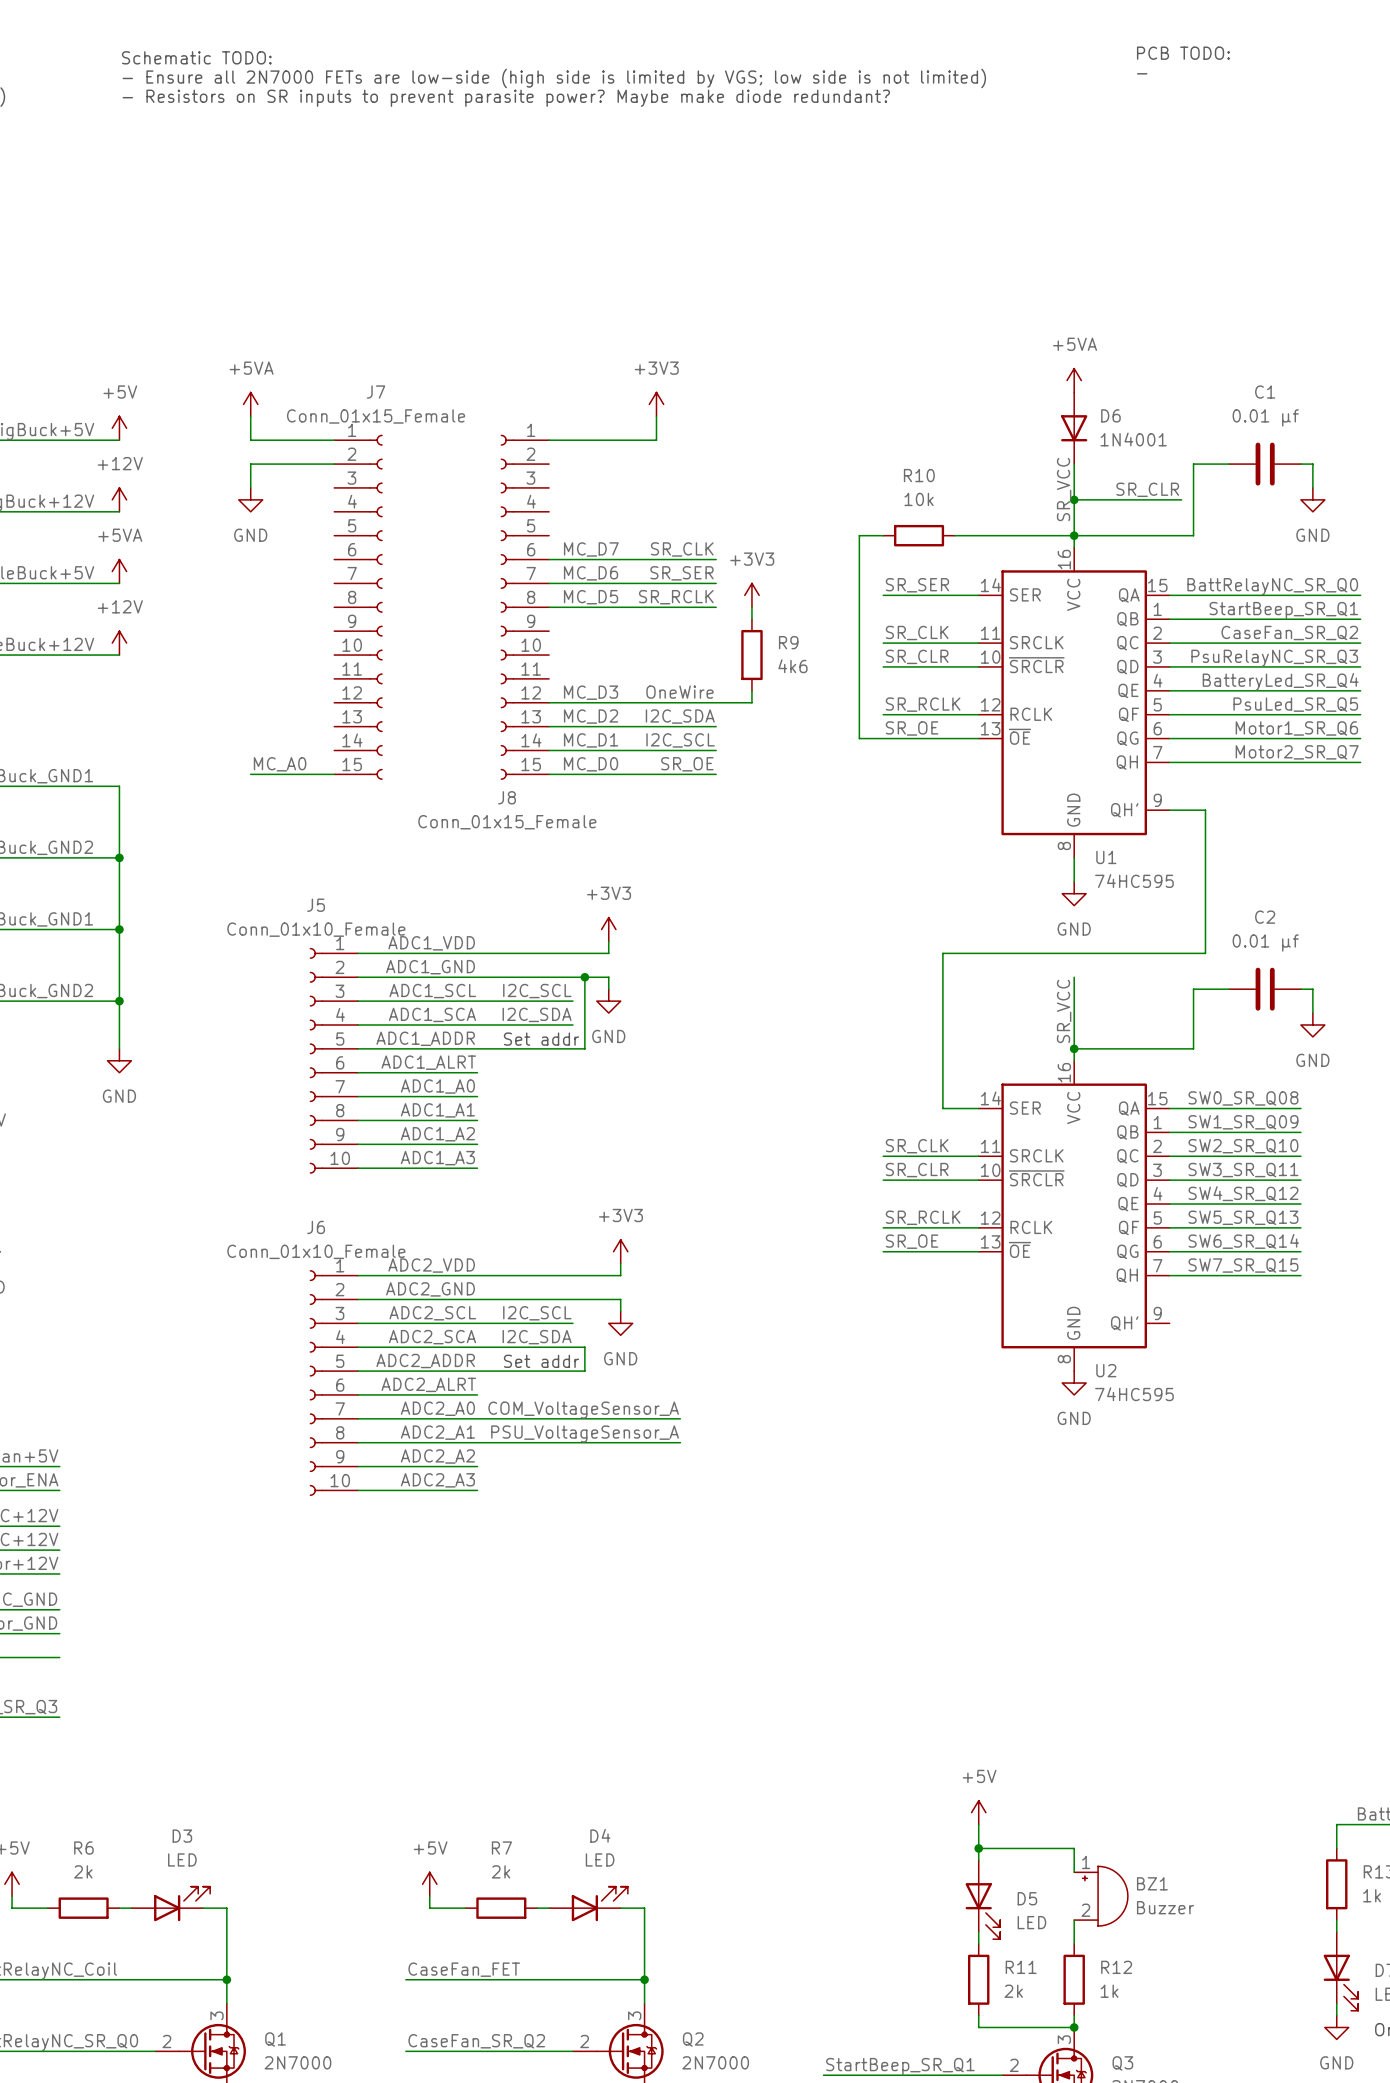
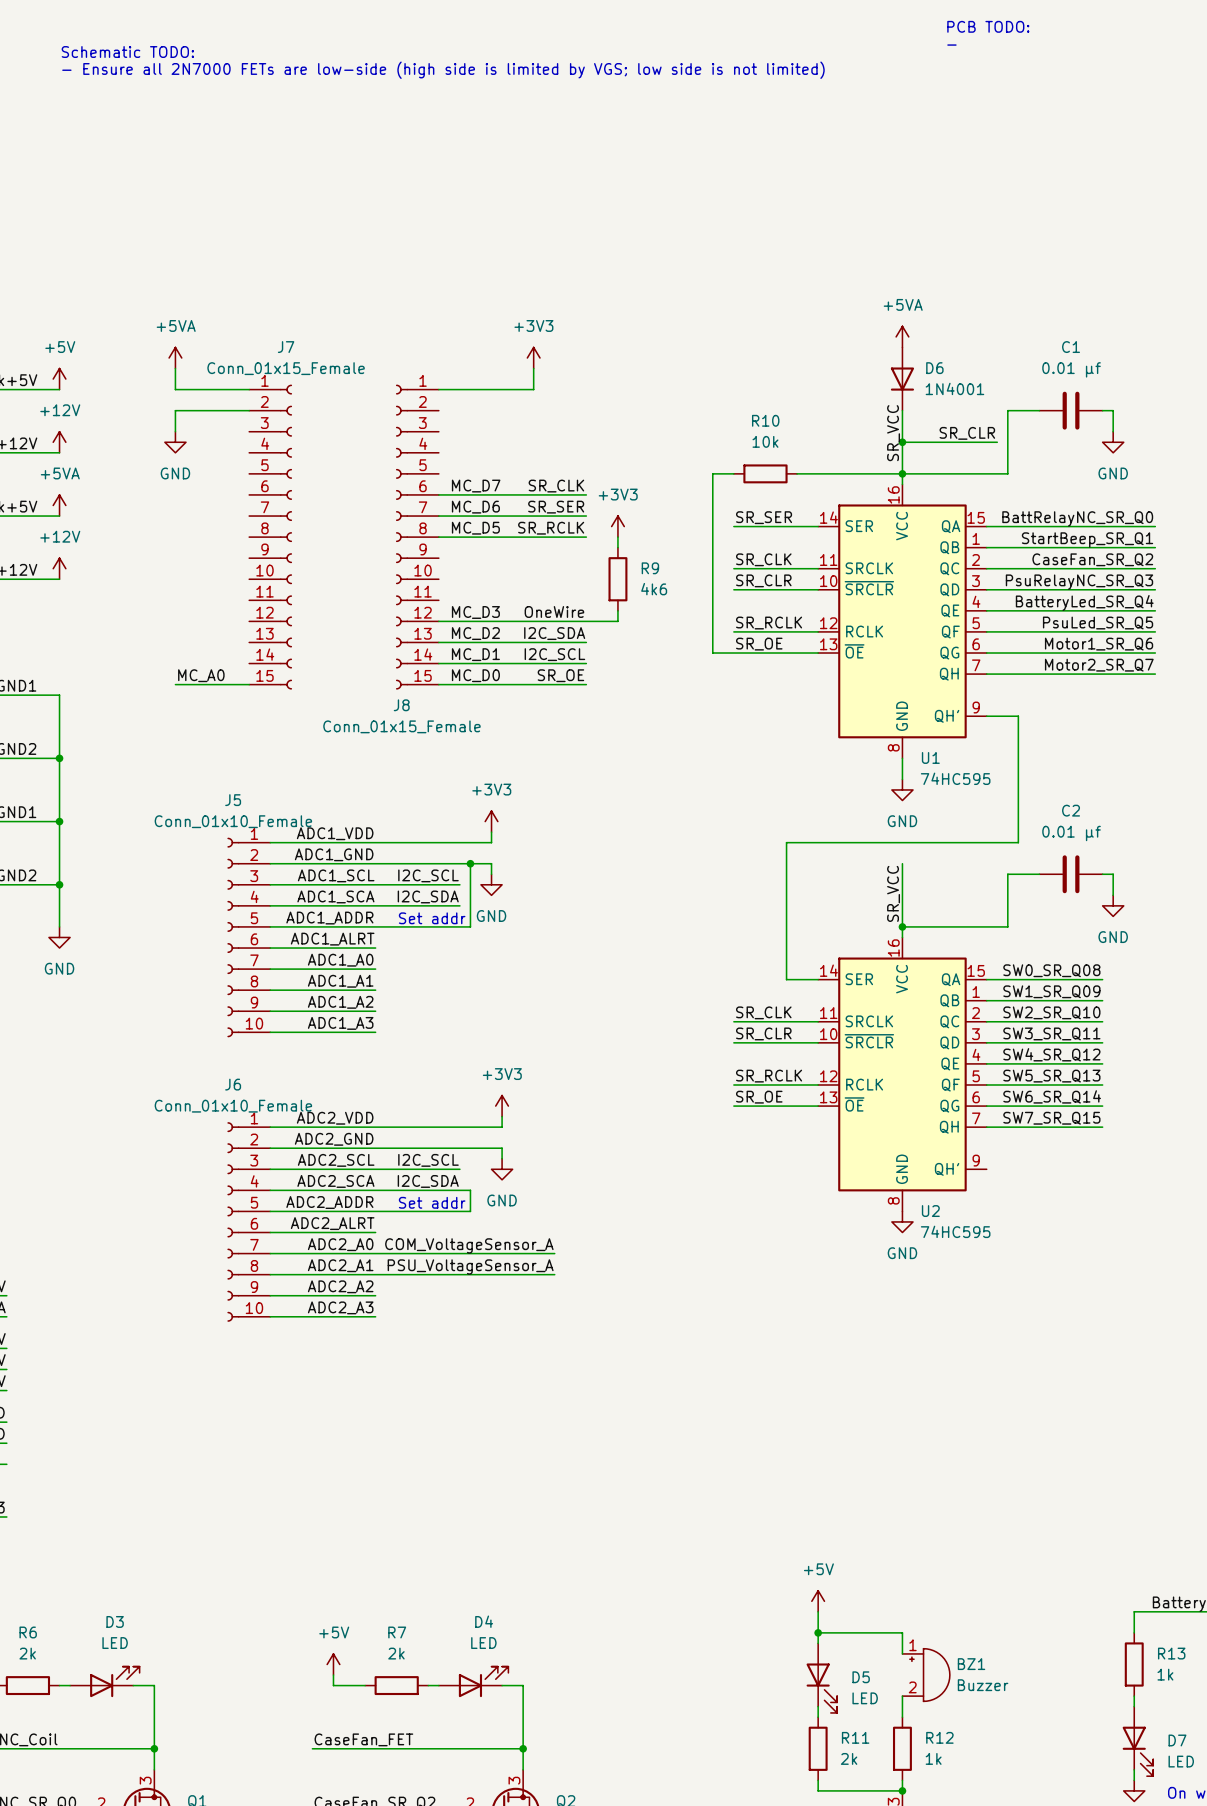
text position: PCB TODO: (1183, 53) -> PCB TODO: (988, 26)
text position: - (1142, 73) -> - (951, 45)
text: - Resistors on SR inputs to prevent parasite power? Maybe make diode redundant? (506, 98) -> none

